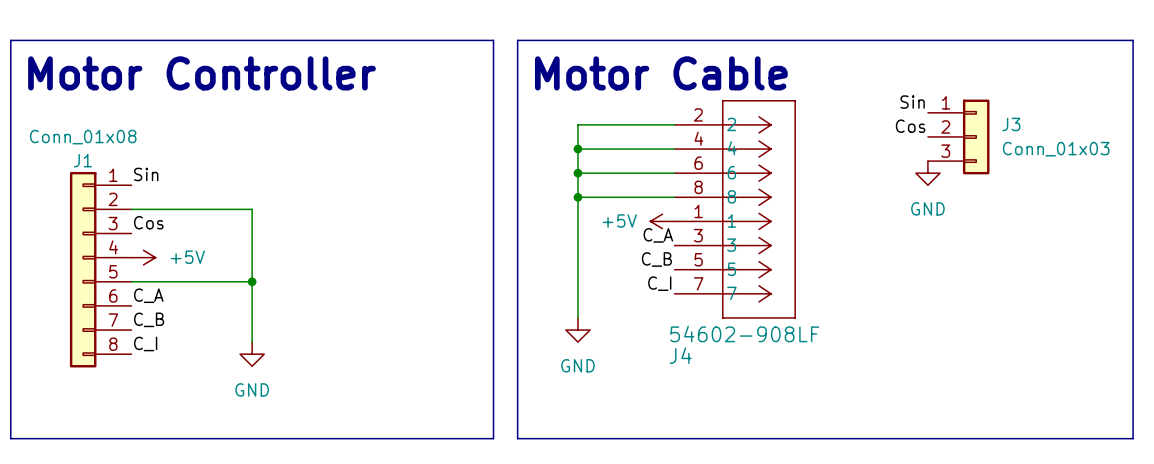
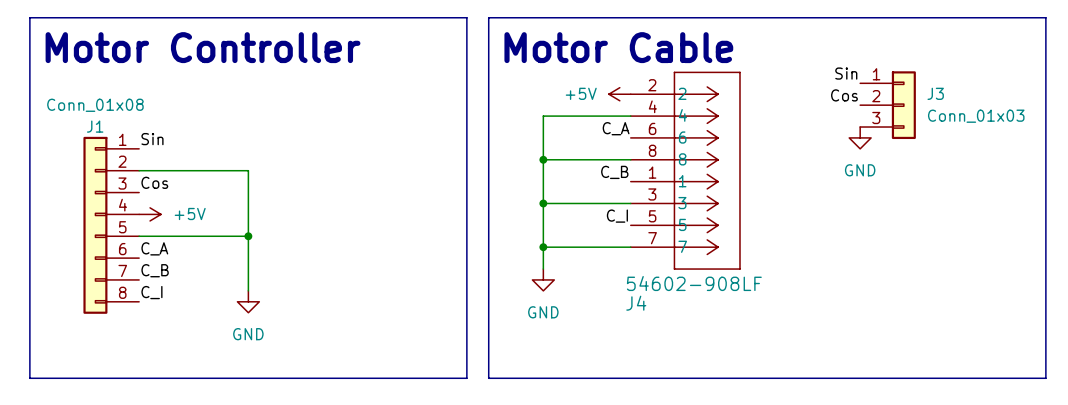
wire: (674, 124) (577, 124) (577, 149) -> none
junction: (577, 149) -> none
wire: (577, 173) (674, 173) -> (543, 203) (630, 203)
junction: (577, 173) -> none
label: none -> C_B (614, 172)
power symbol position: +5V (662, 221) -> +5V (619, 94)
label position: C_A (658, 235) -> C_A (616, 128)
junction: none -> (543, 203)
label: C_B (656, 259) -> C_I (617, 216)
label: C_I (659, 283) -> none
wire: none -> (543, 247) (630, 247)
junction: none -> (543, 247)

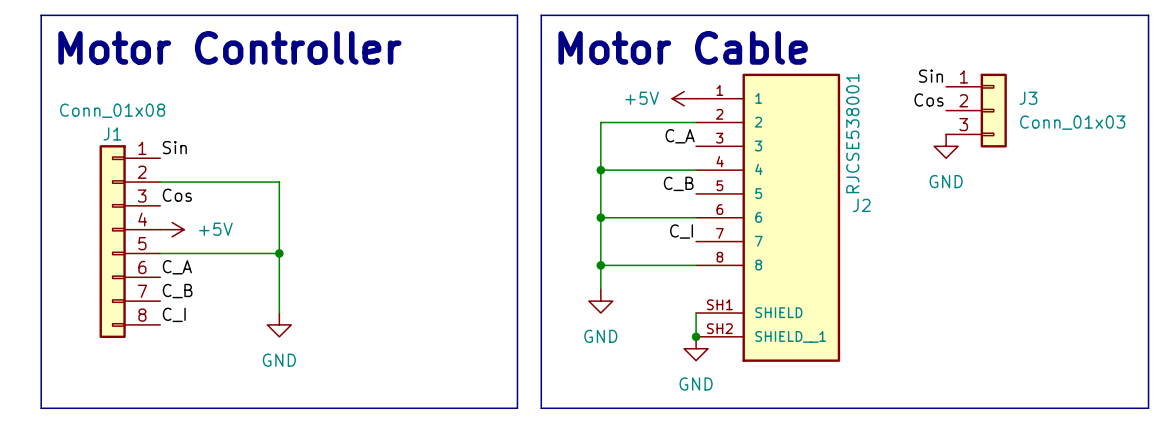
J4: 54602-908LF (685, 170) -> none
J2: none -> RJCSE538001 (768, 217)
wire: none -> (696, 313) (696, 336)
junction: none -> (696, 336)
power symbol: none -> GND (696, 348)

